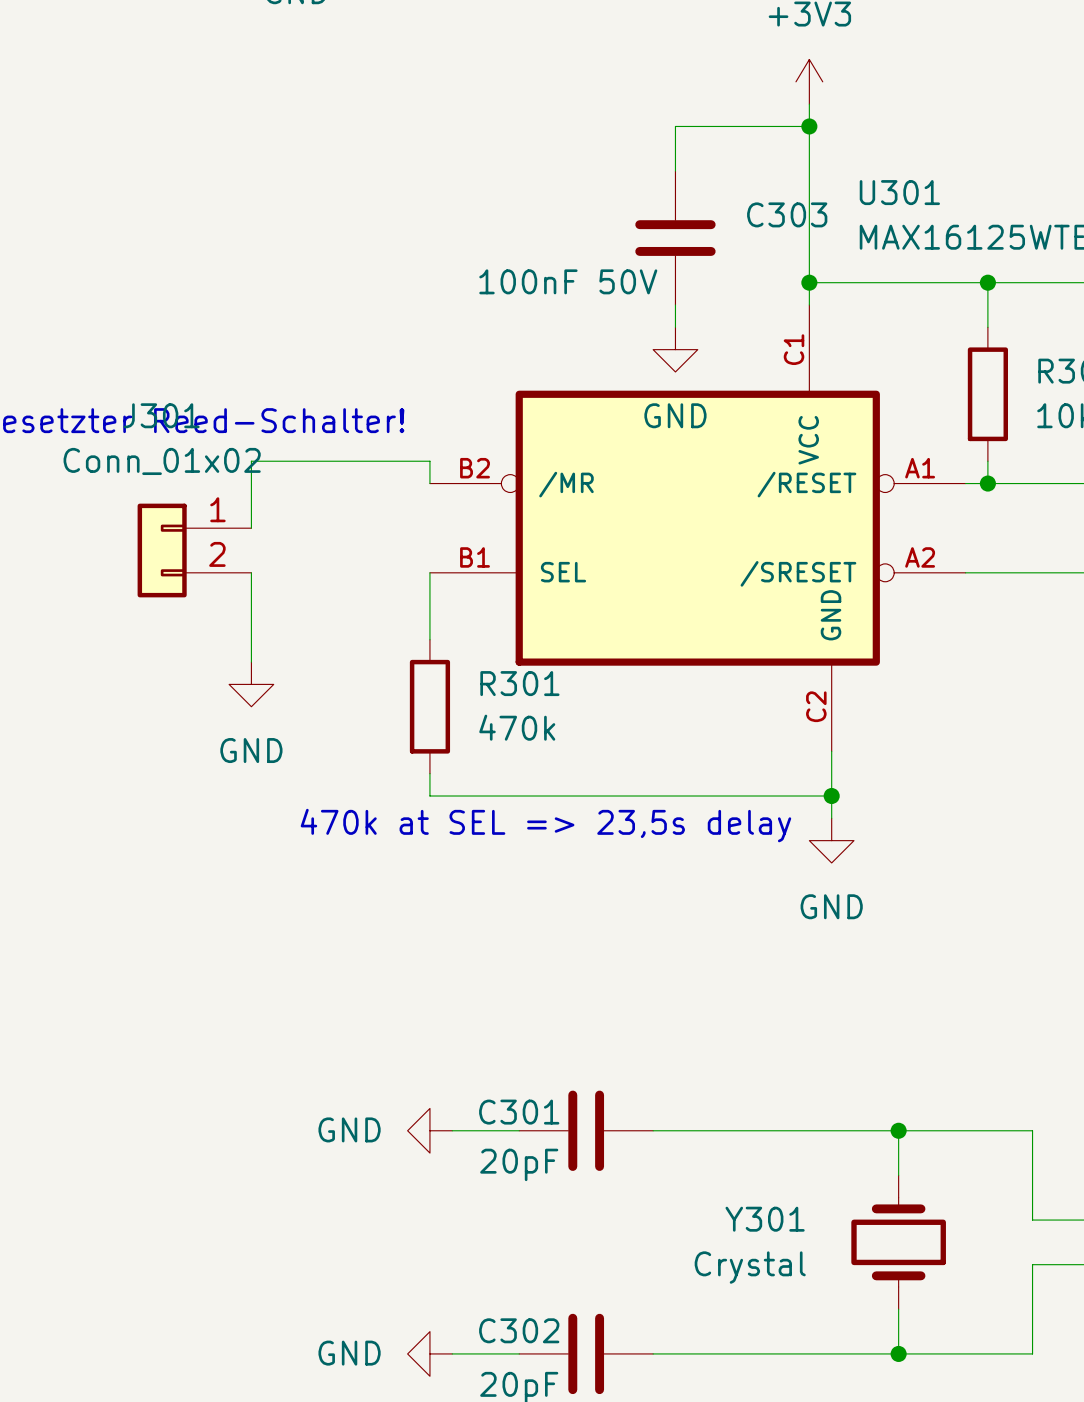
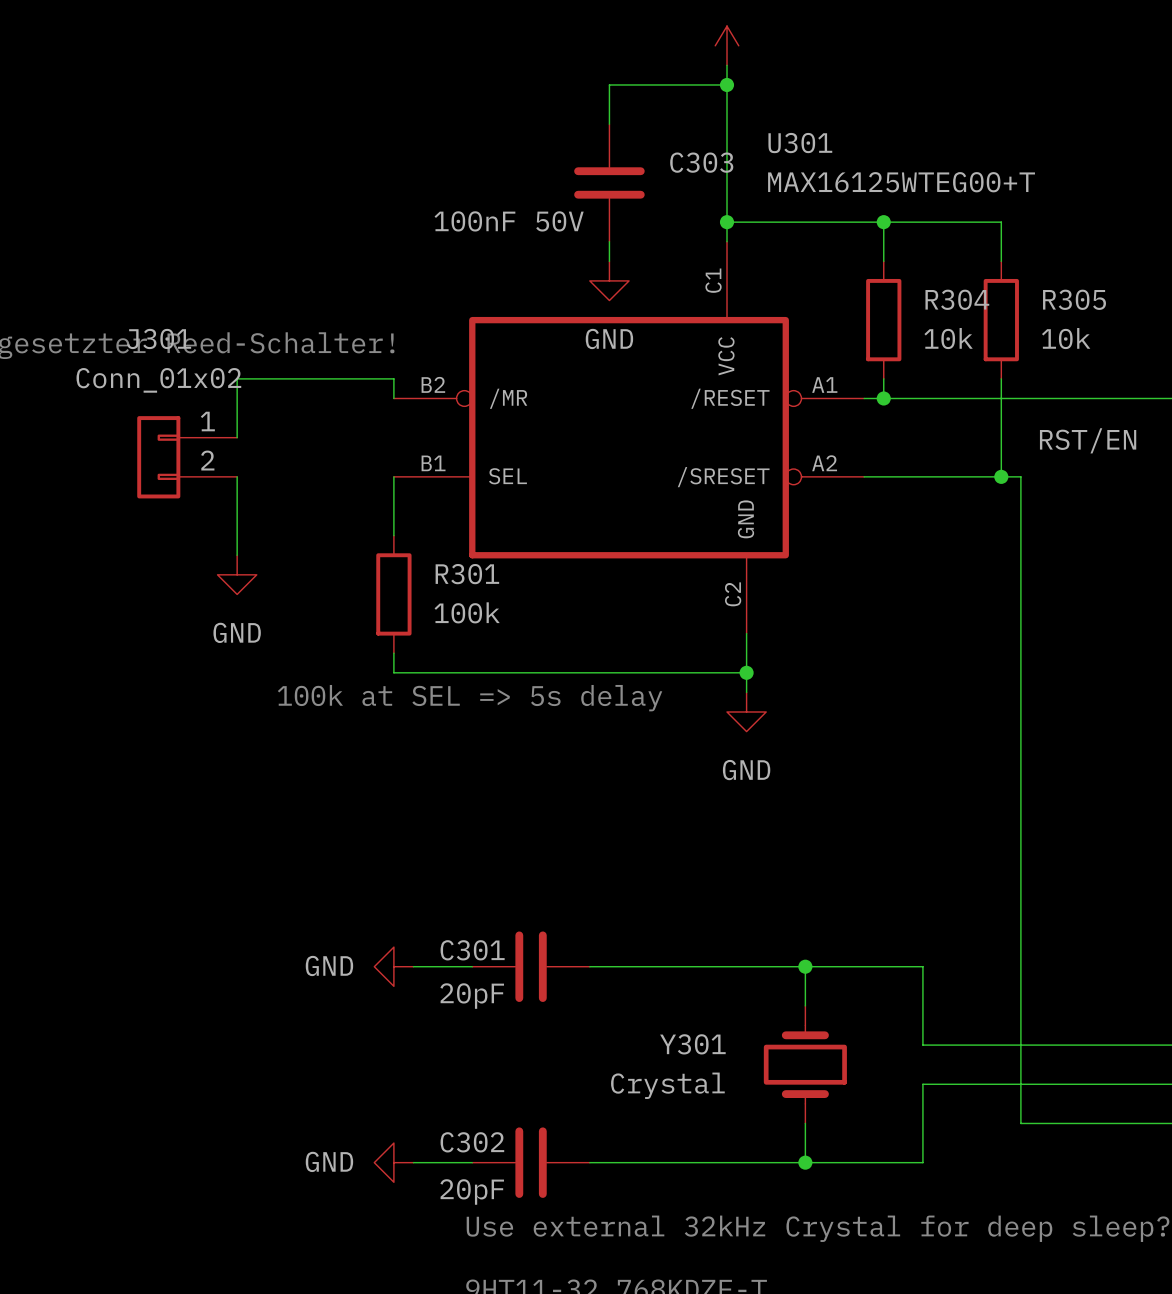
R301 value: 470k (517, 727) -> 100k (467, 612)
text: 470k at SEL => 23,5s delay (545, 825) -> 100k at SEL => 5s delay (470, 698)

